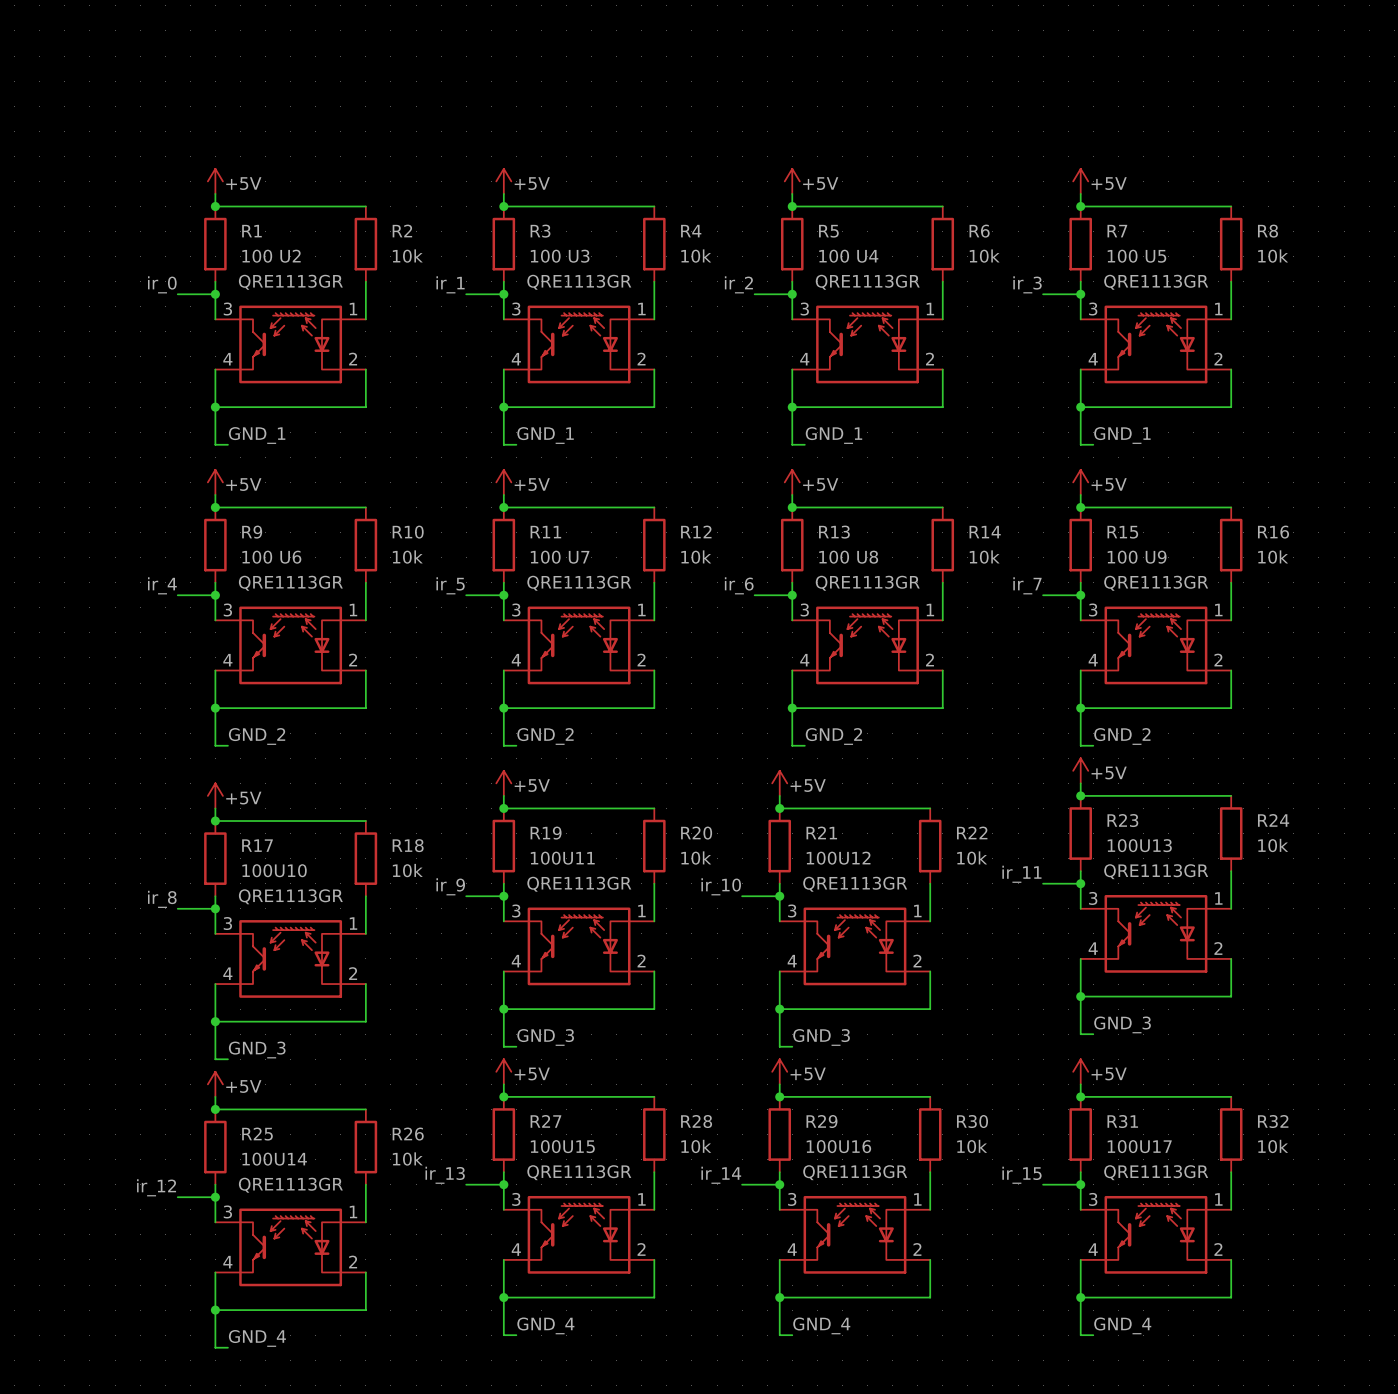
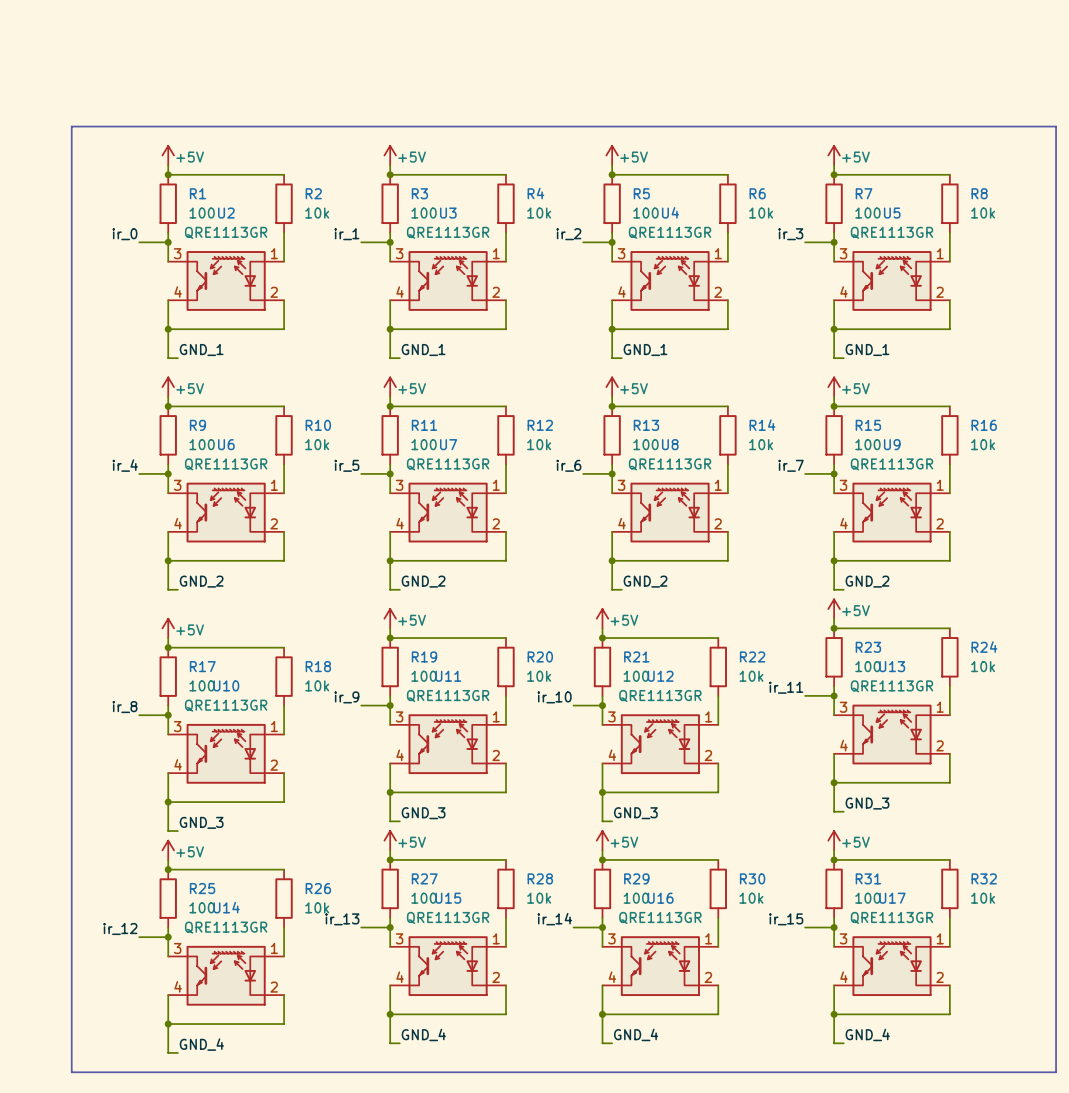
line: none -> (71, 126) (1056, 126) (1056, 1072) (71, 1072) (71, 126)

